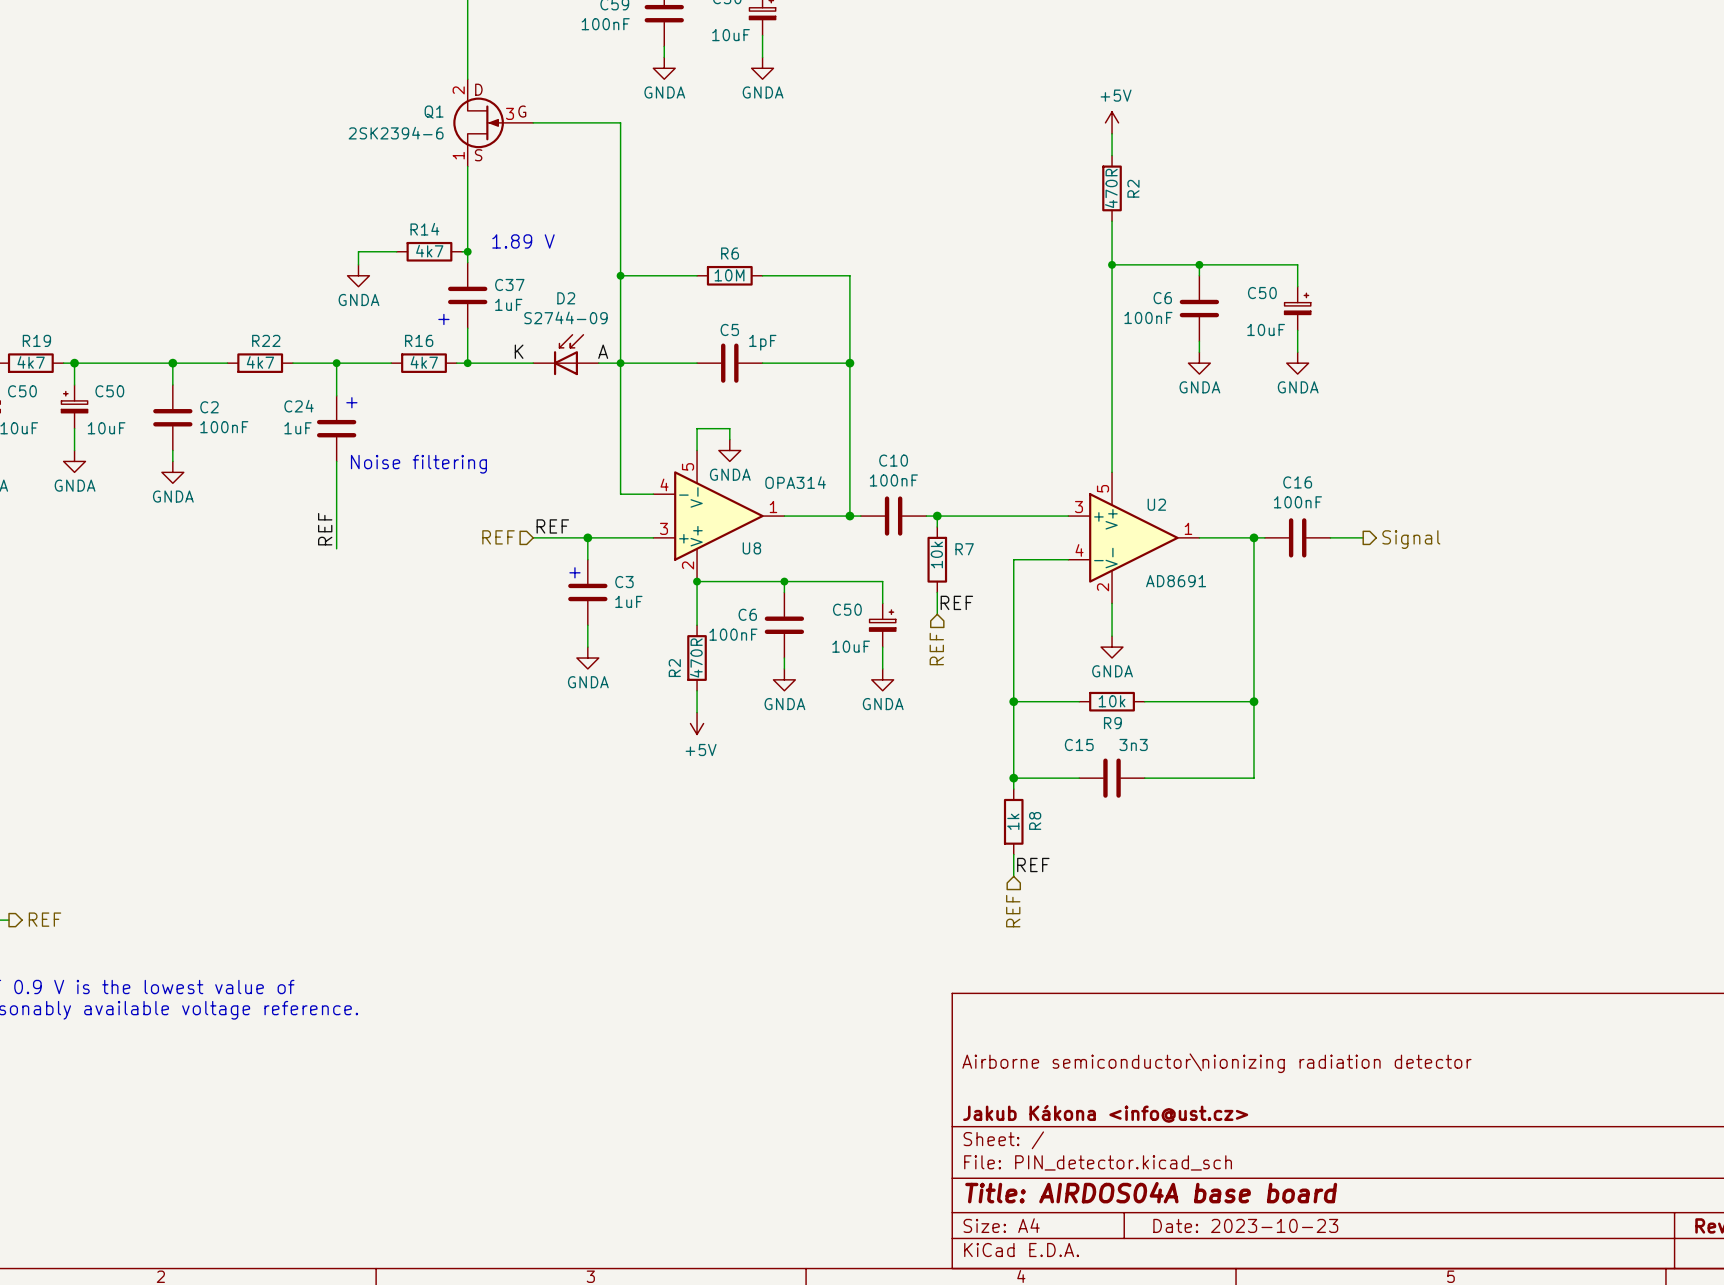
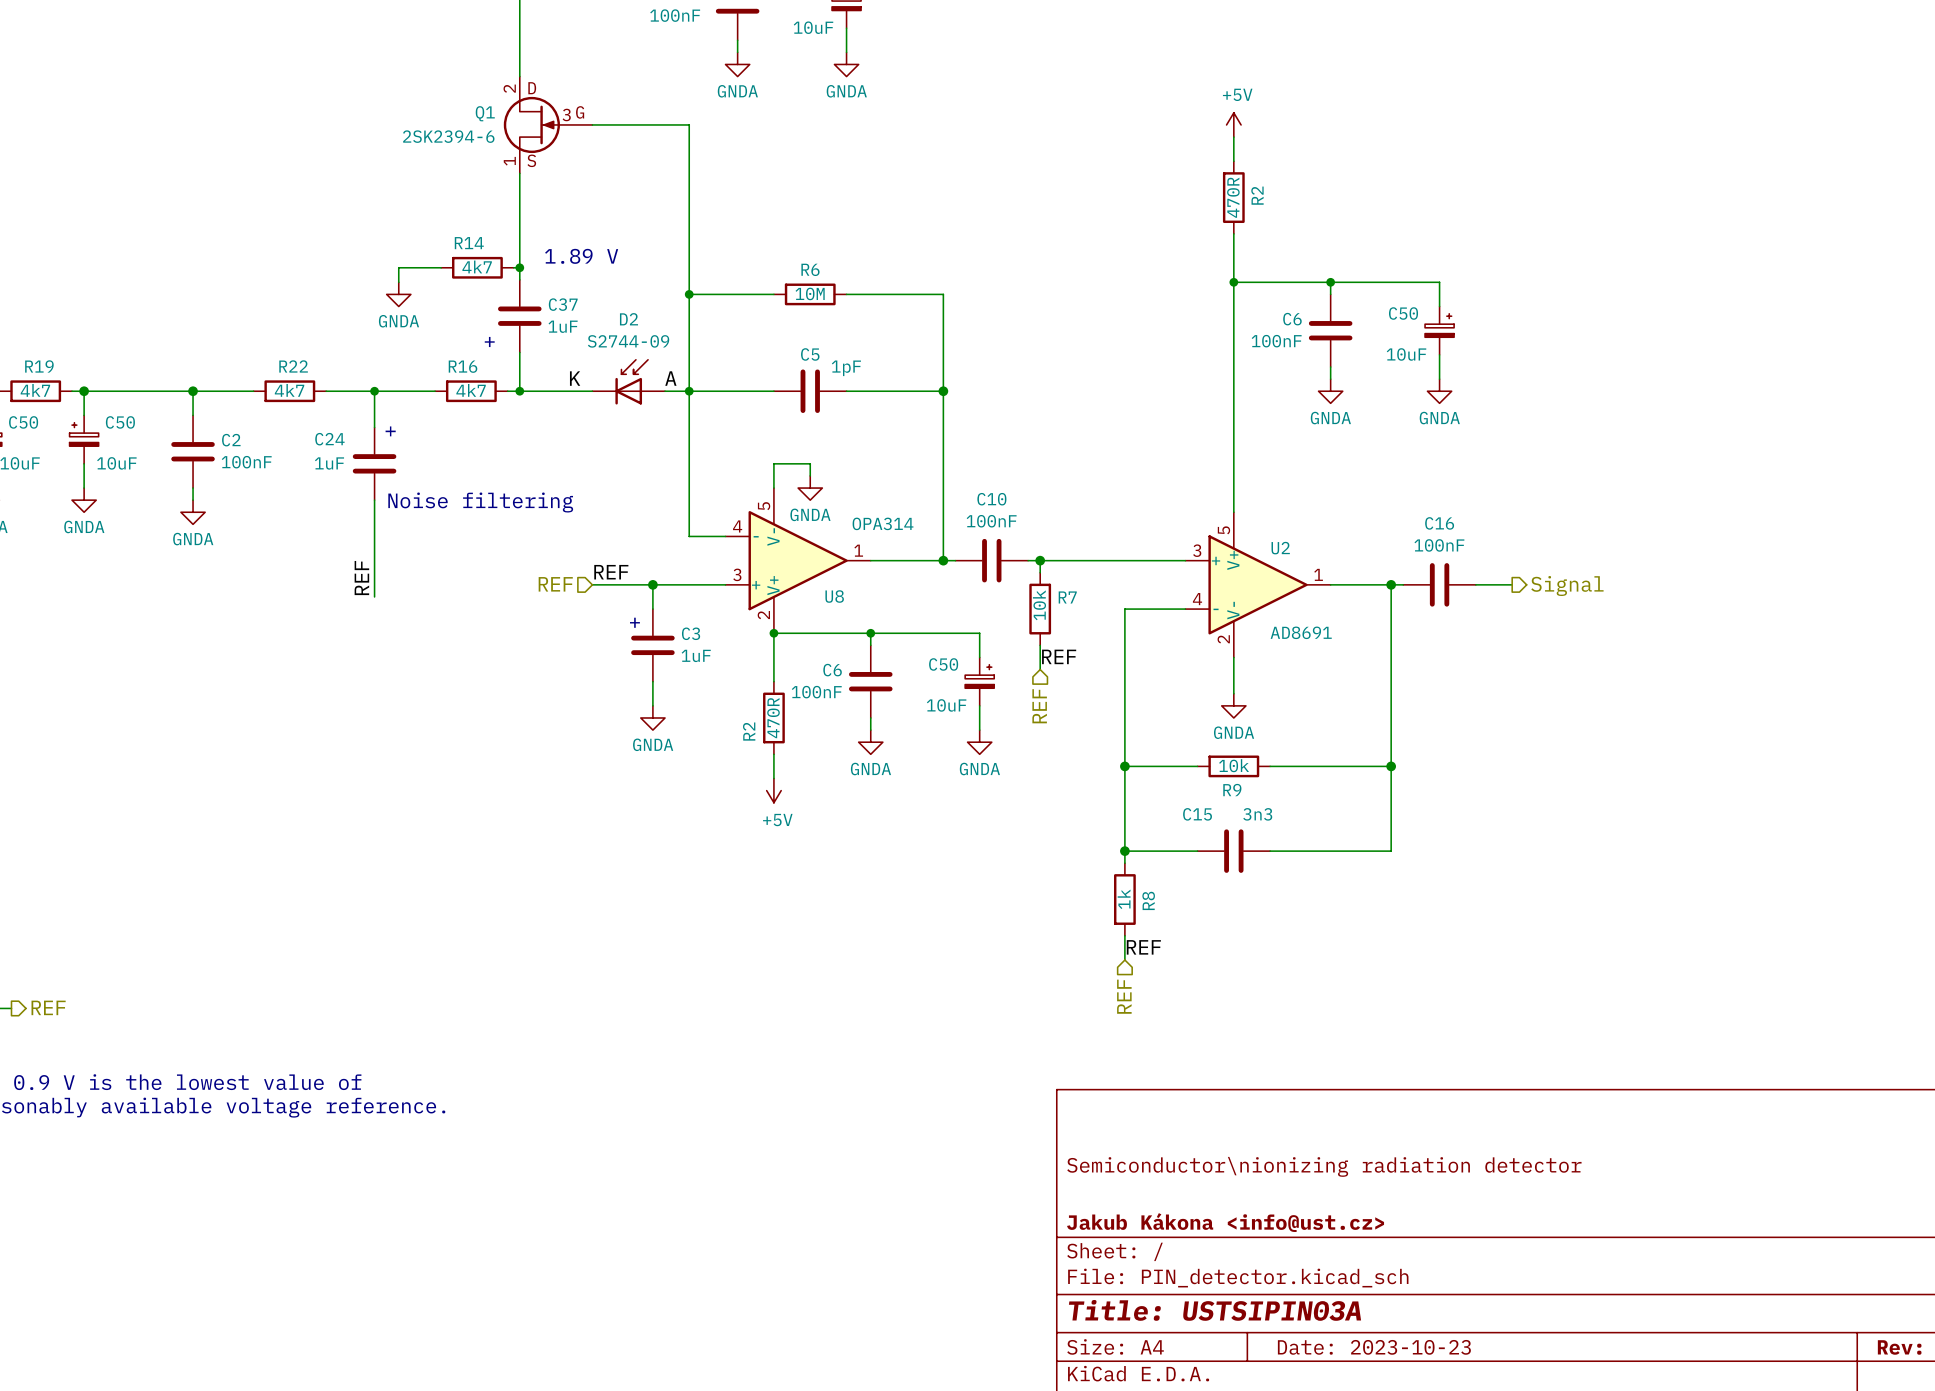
title block: Airborne semiconductor\nionizing radiation detector (1216, 1063) -> Semiconductor\nionizing radiation detector (1324, 1166)
title block: Title: AIRDOS04A base board (1151, 1192) -> Title: USTSIPIN03A (1214, 1310)

